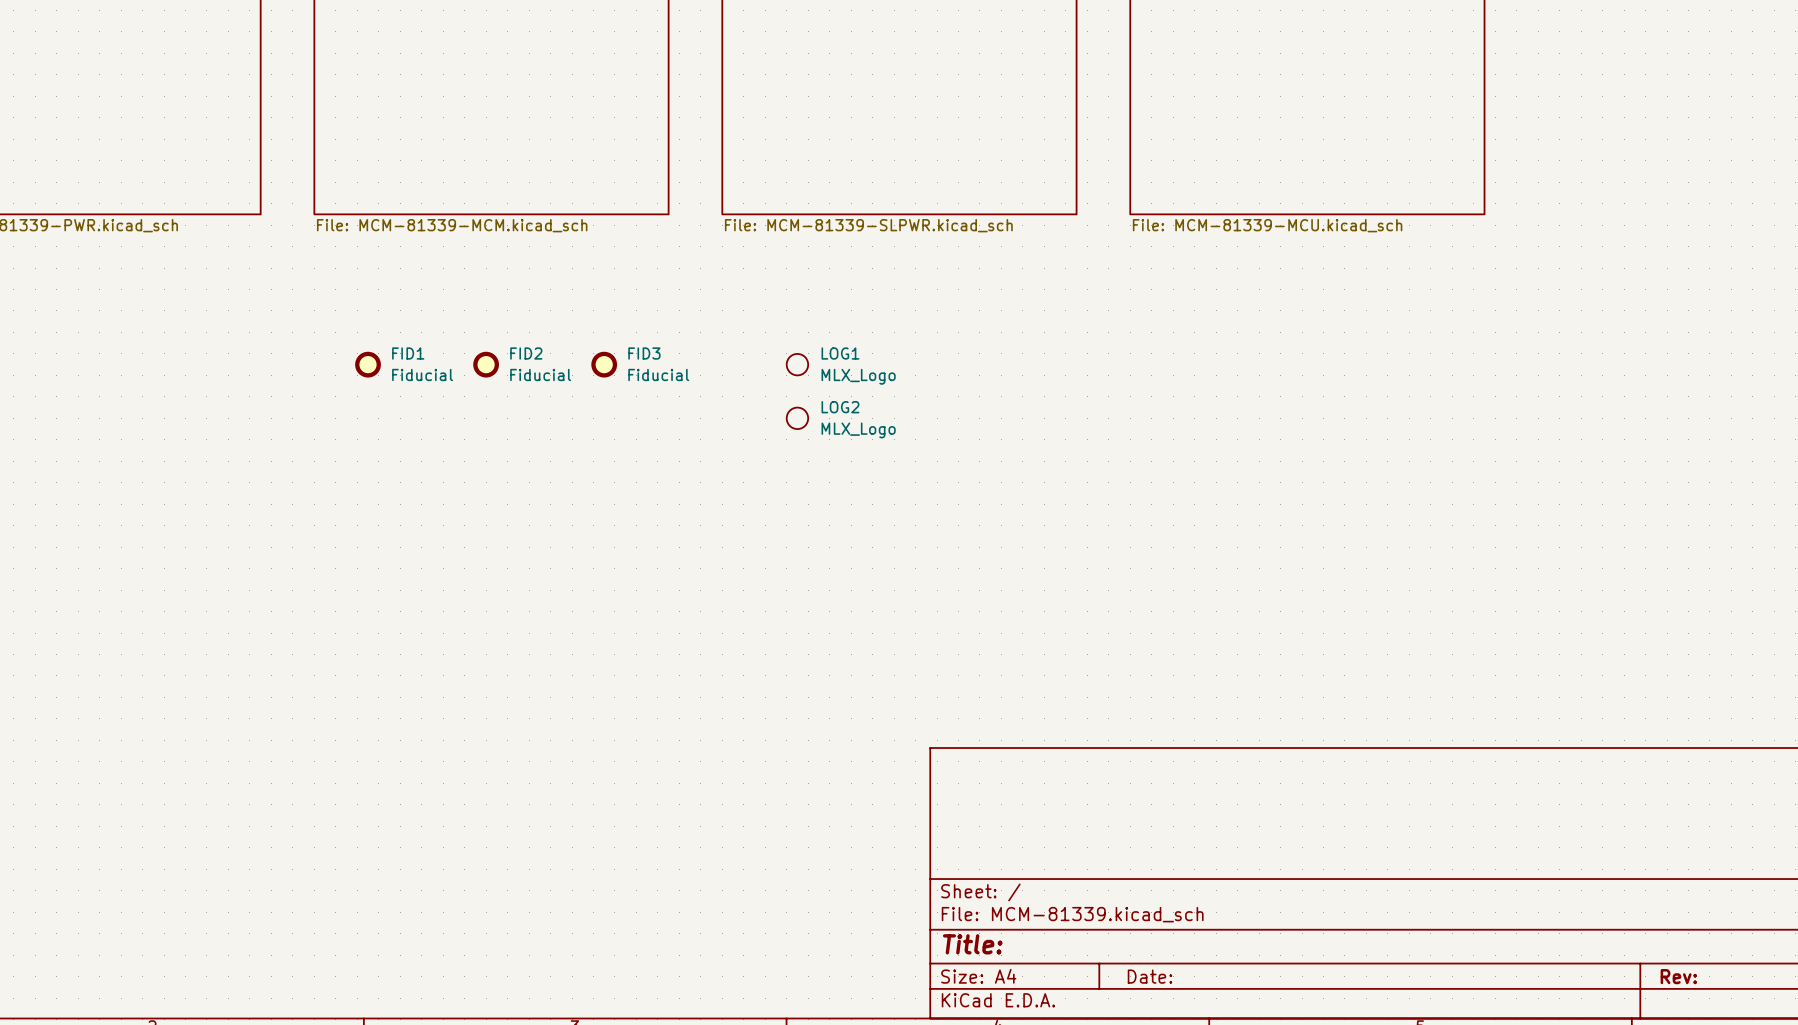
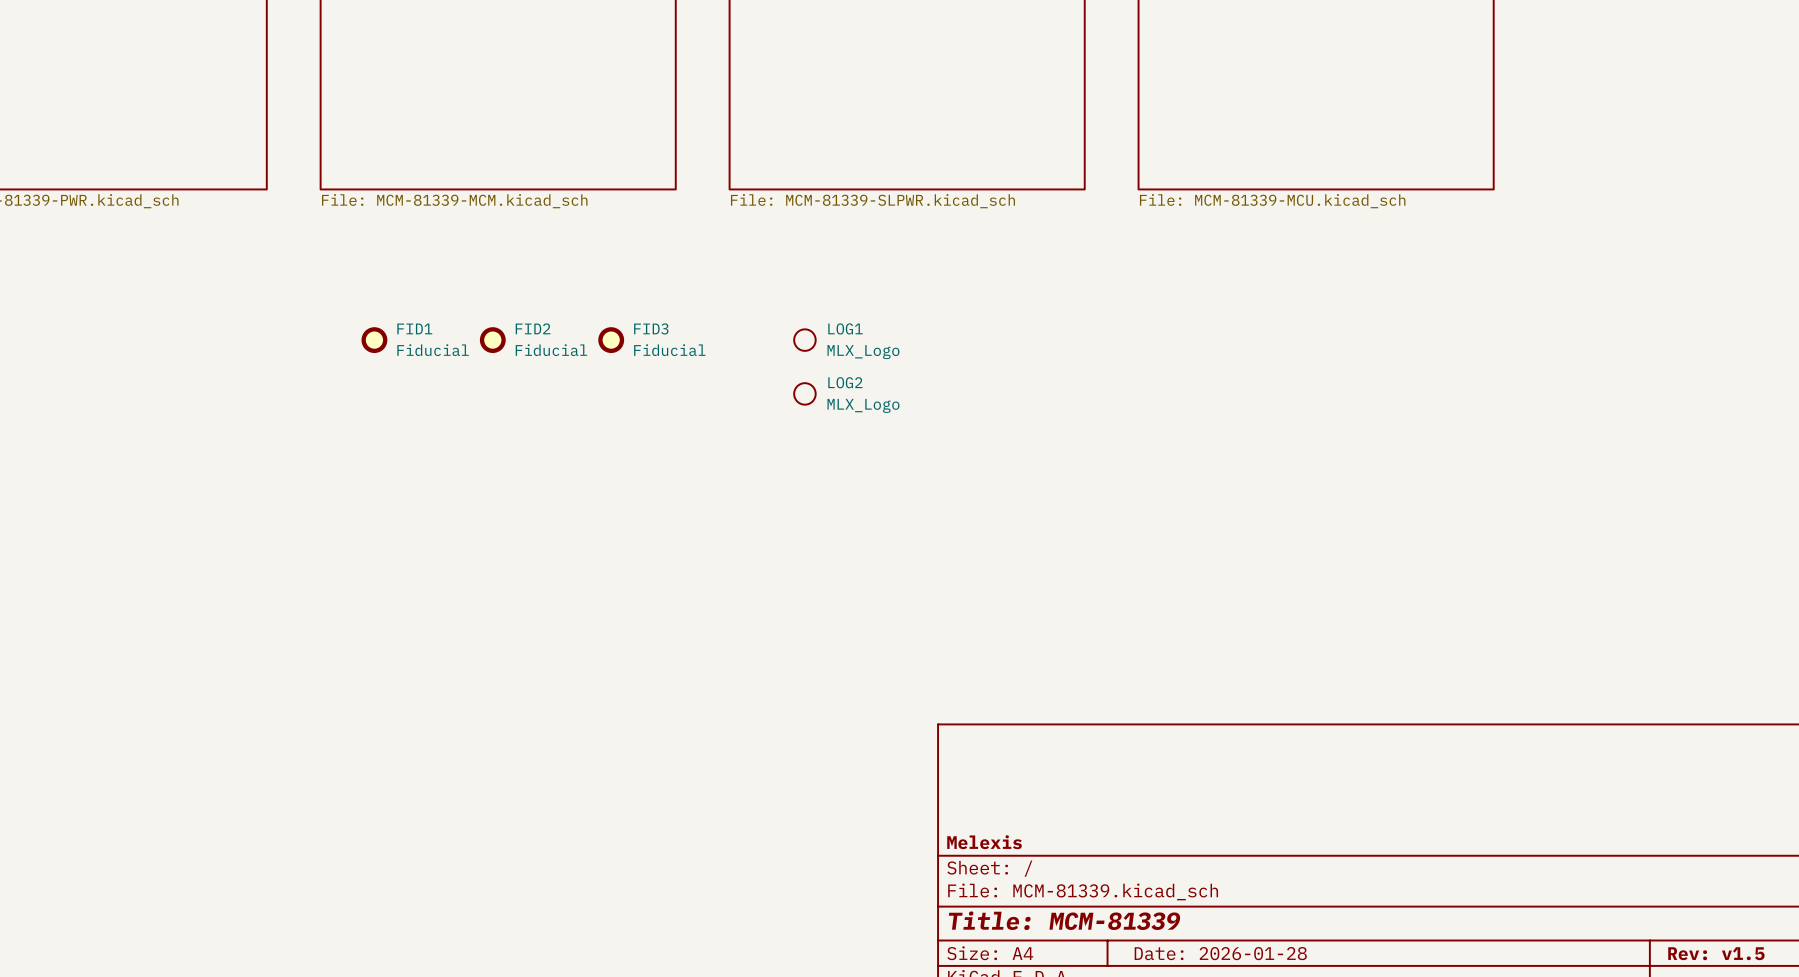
title block: none -> Melexis (984, 842)
title block: Title: (972, 944) -> Title: MCM-81339 (1064, 920)
title block: Date: (1149, 976) -> Date: 2026-01-28 (1220, 953)
title block: Rev: (1678, 976) -> Rev: v1.5 (1716, 953)

